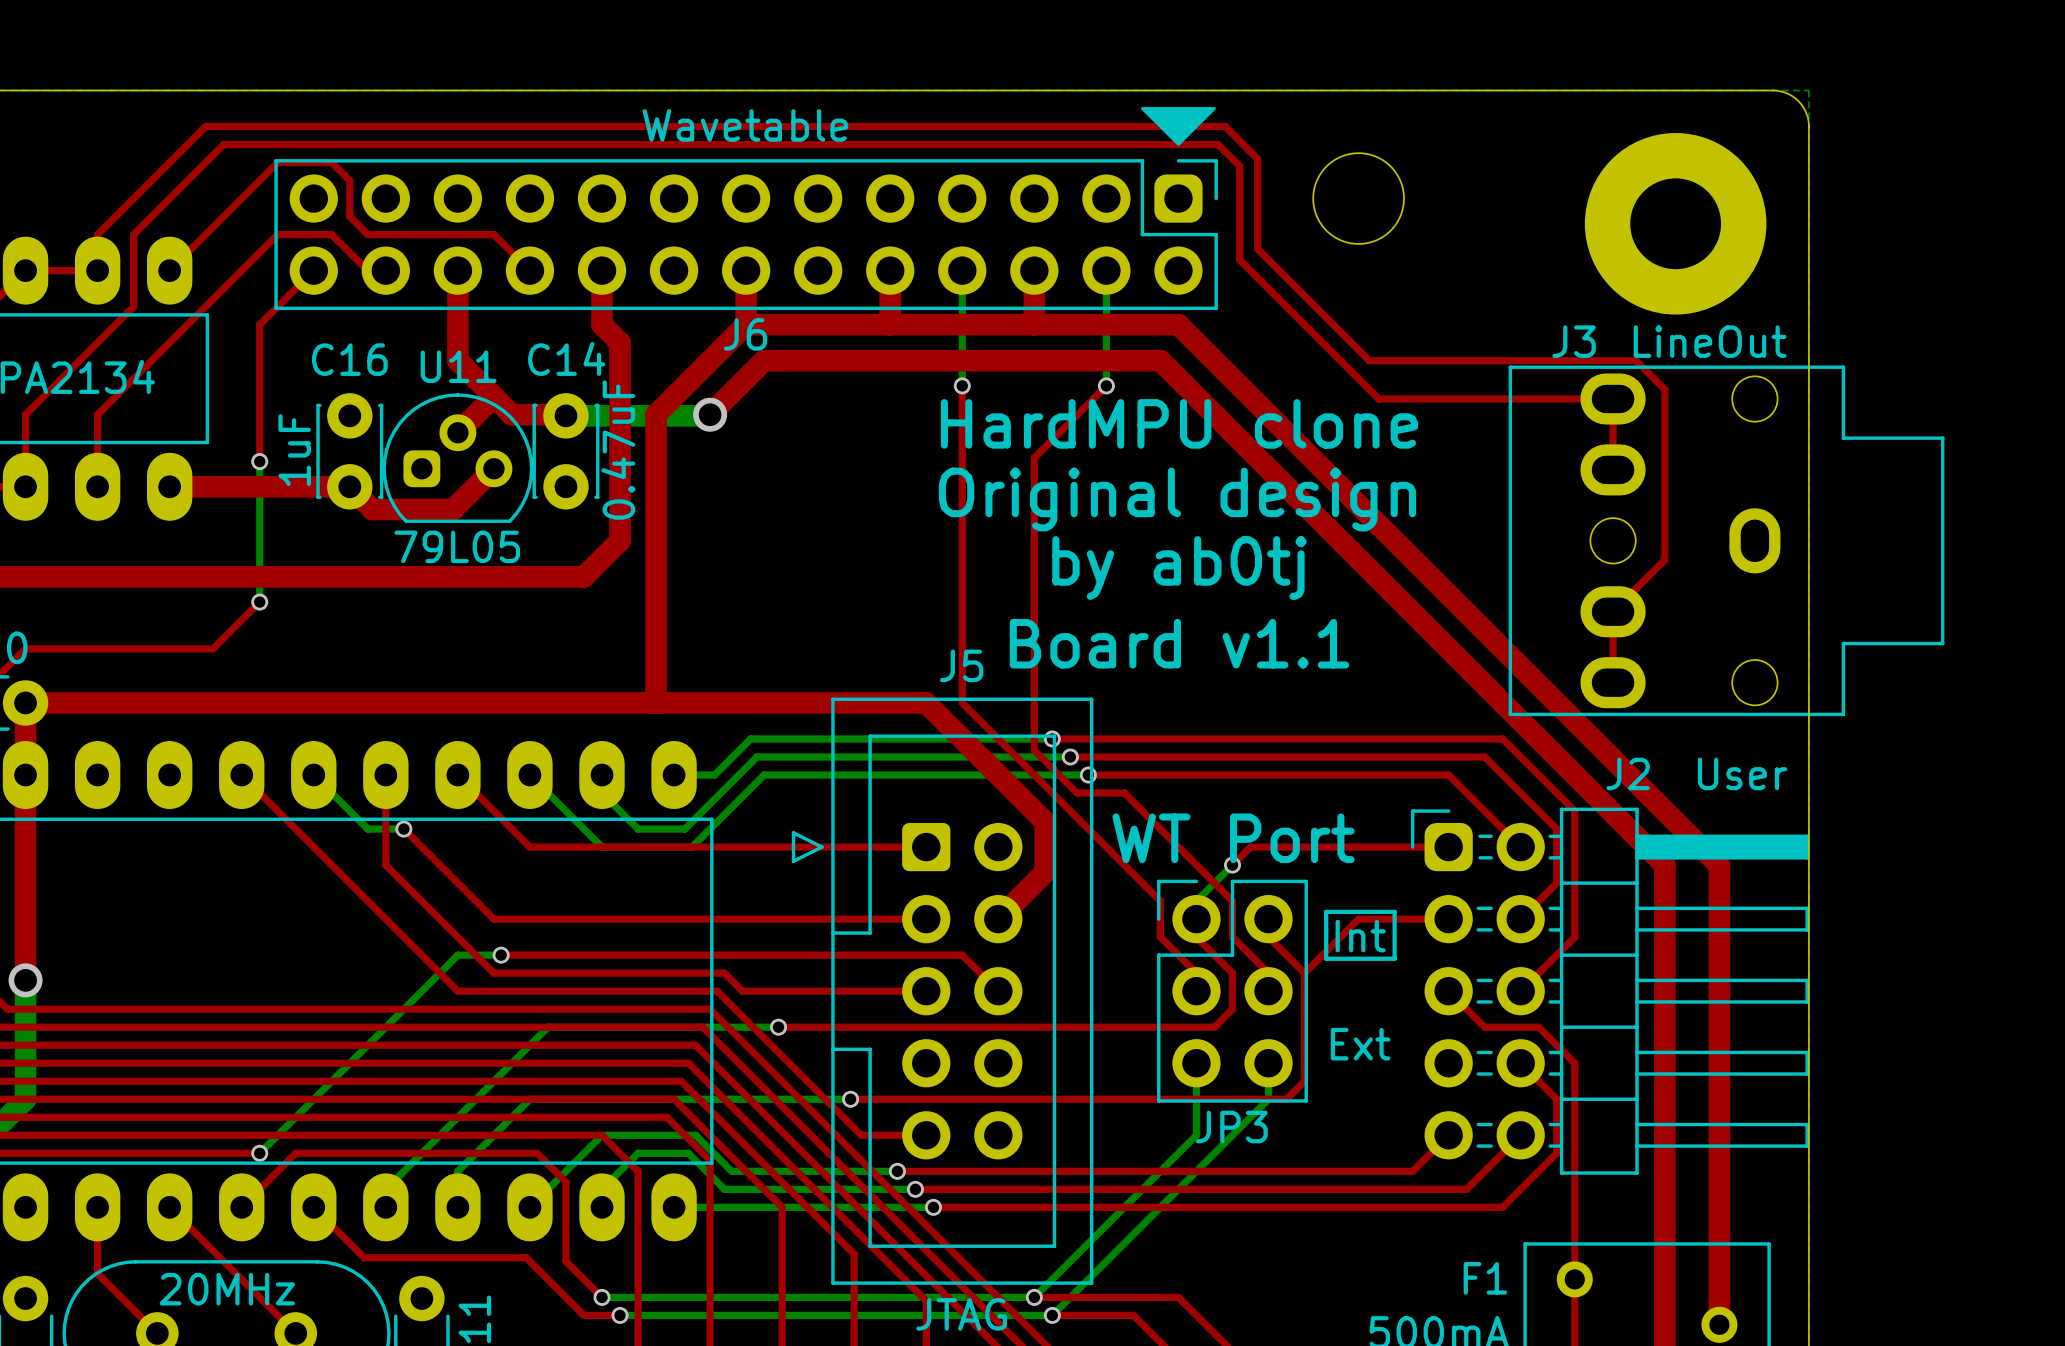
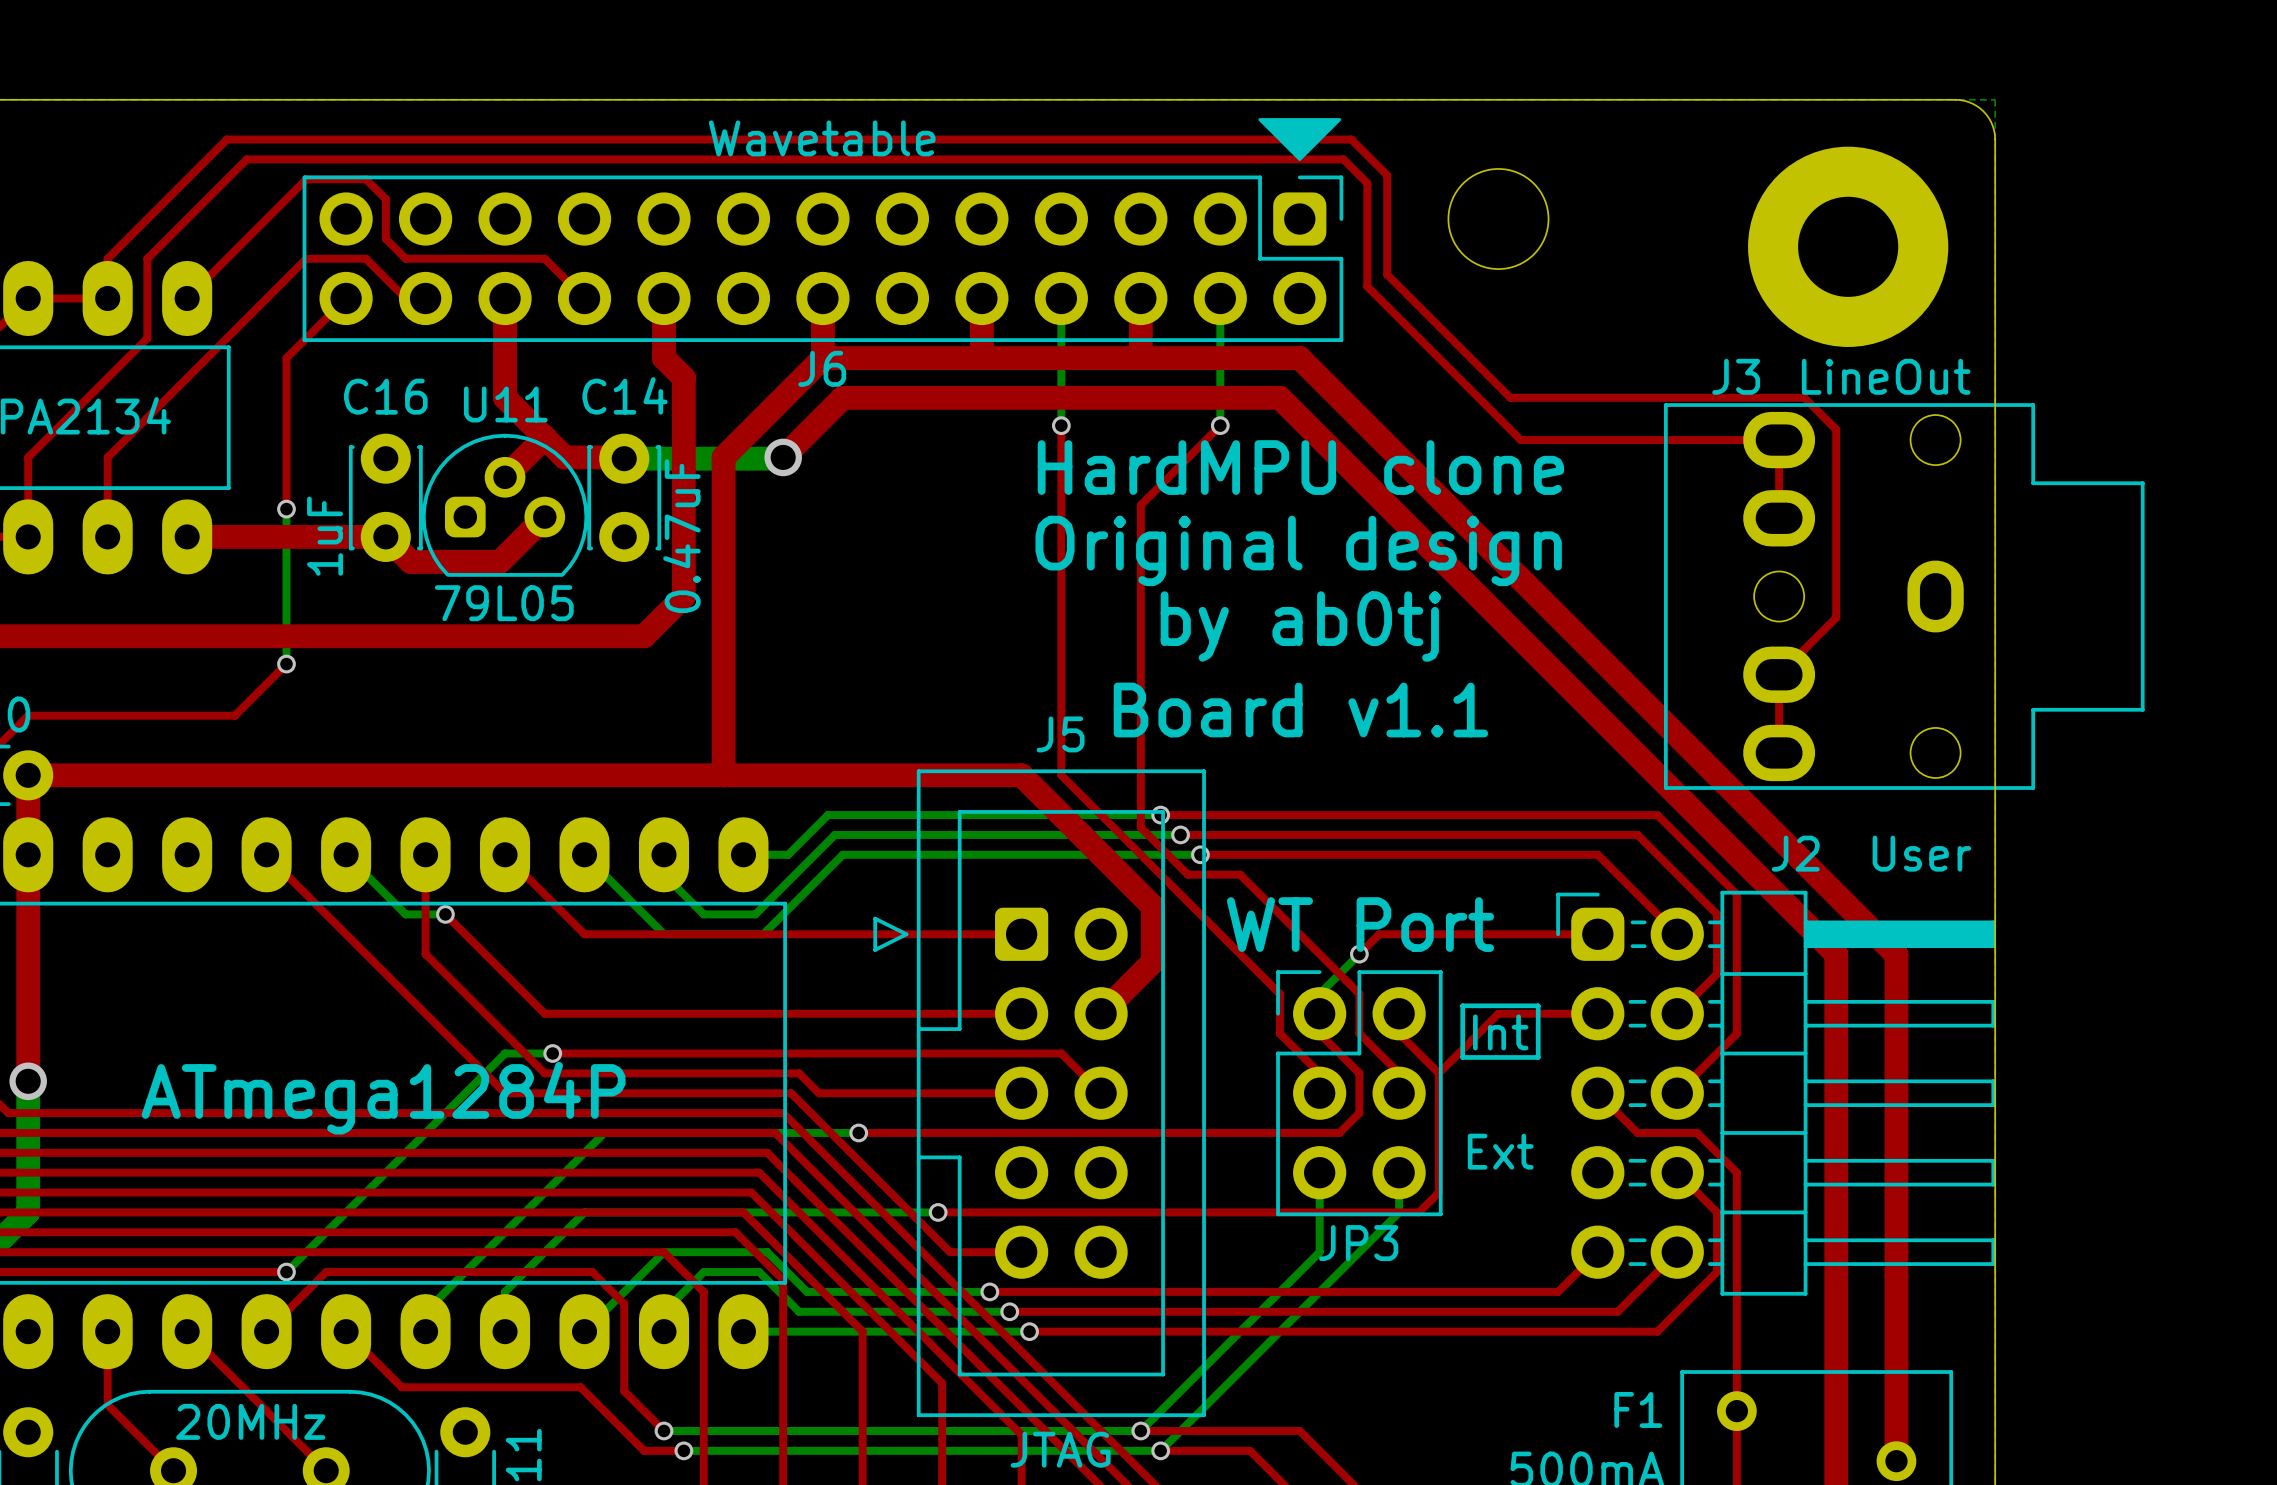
C16 value position: 1uF (294, 450) -> 1uF (325, 536)
C14 value position: 0.47uF (618, 450) -> 0.47uF (681, 536)
part value: none -> ATmega1284P (383, 1098)

